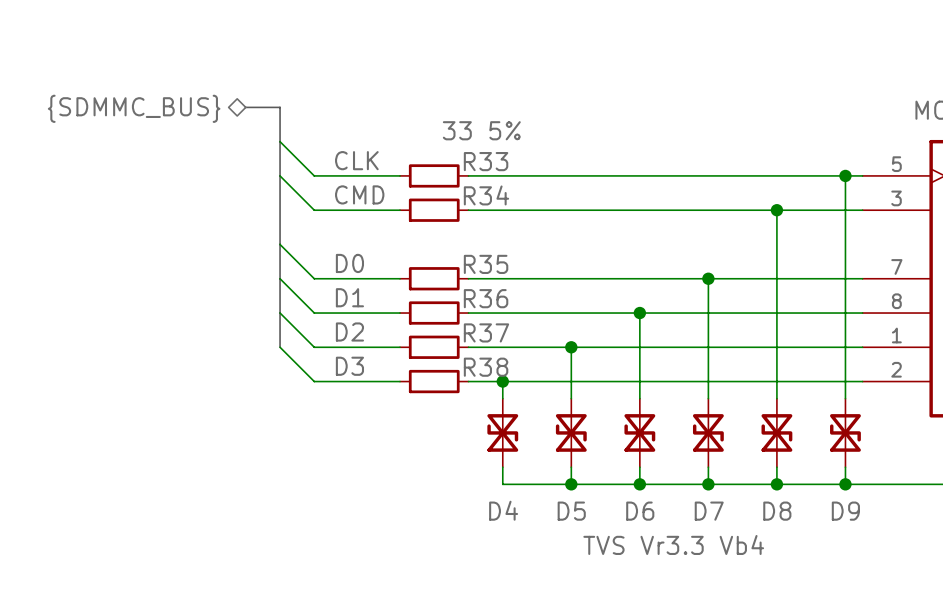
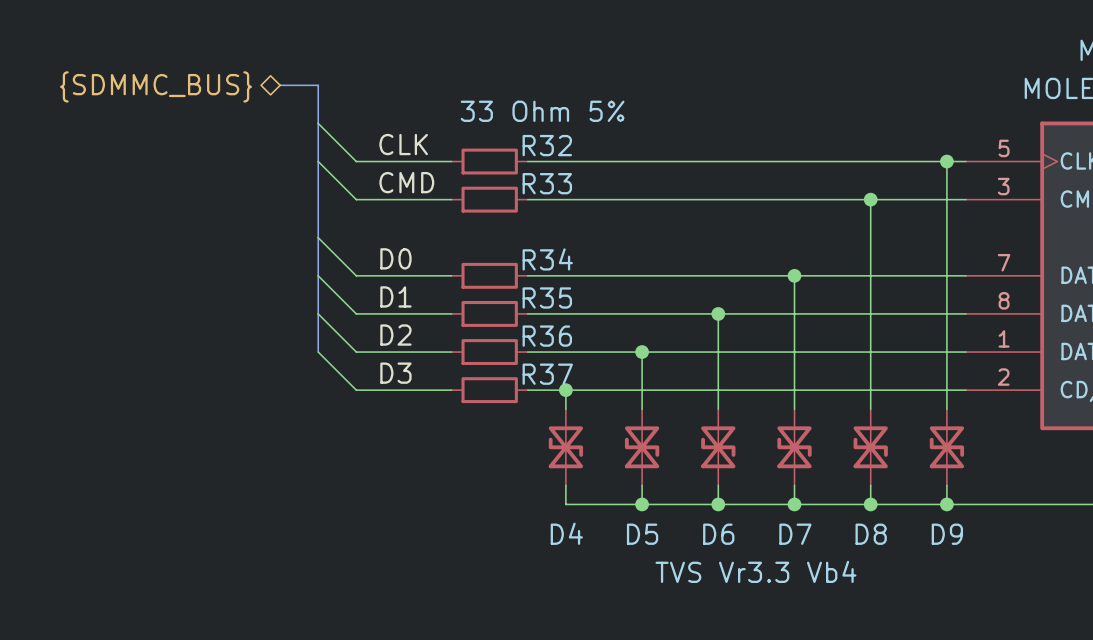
R38 value: 33 5% (481, 130) -> 33 Ohm 5% (542, 111)
R33 name: R33 (486, 161) -> R32 (547, 145)
R34 name: R34 (486, 195) -> R33 (547, 183)
R35 name: R35 (486, 264) -> R34 (547, 259)
R36 name: R36 (486, 298) -> R35 (547, 297)
R37 name: R37 (486, 332) -> R36 (547, 336)
R38 name: R38 (486, 367) -> R37 (547, 374)

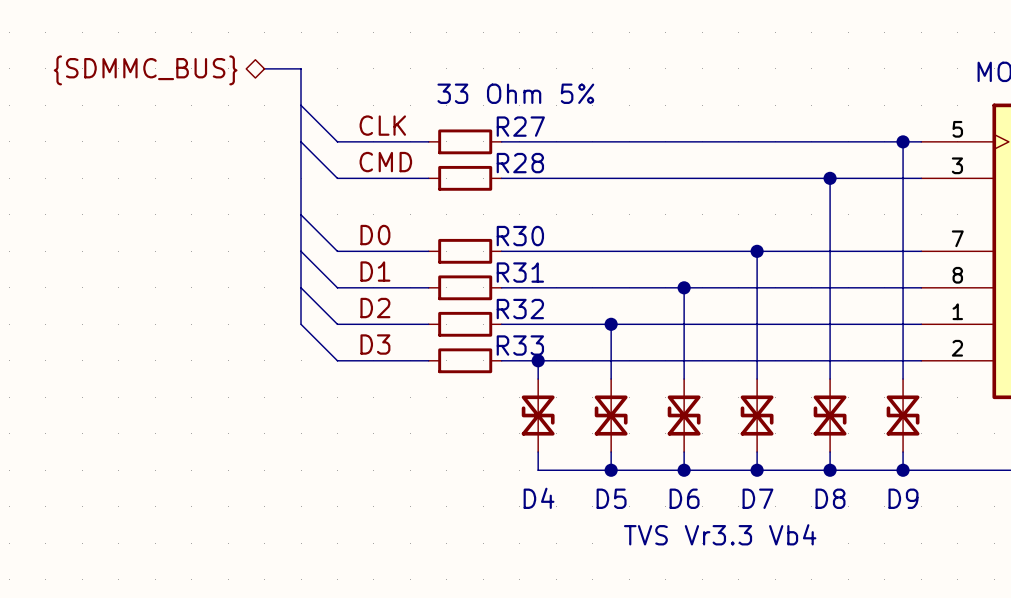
R32 name: R32 (547, 145) -> R27 (520, 126)
R33 name: R33 (547, 183) -> R28 (520, 163)
R34 name: R34 (547, 259) -> R30 (520, 236)
R35 name: R35 (547, 297) -> R31 (520, 272)
R36 name: R36 (547, 336) -> R32 (520, 309)
R37 name: R37 (547, 374) -> R33 (520, 345)

